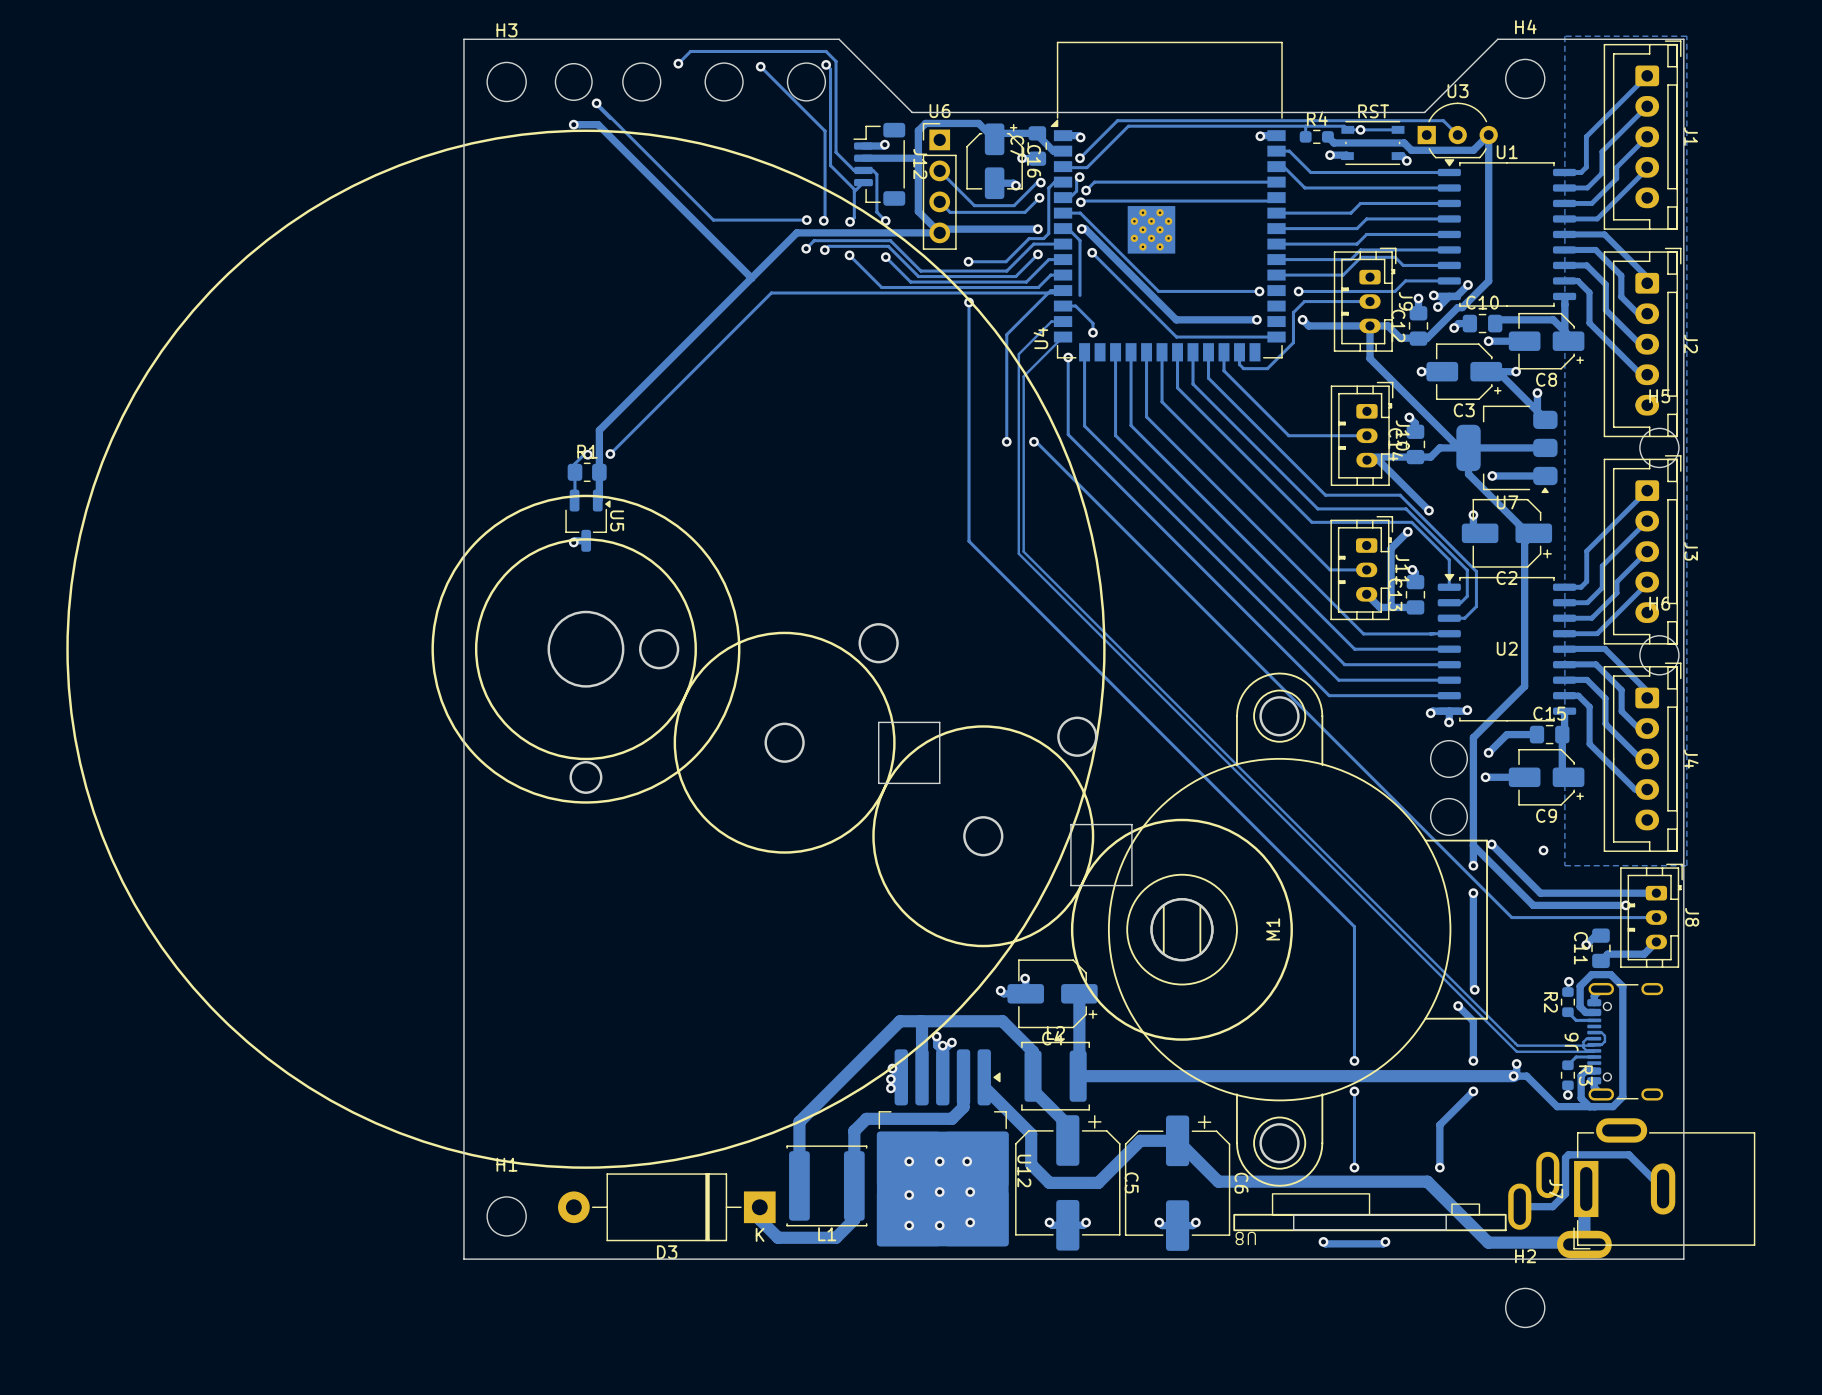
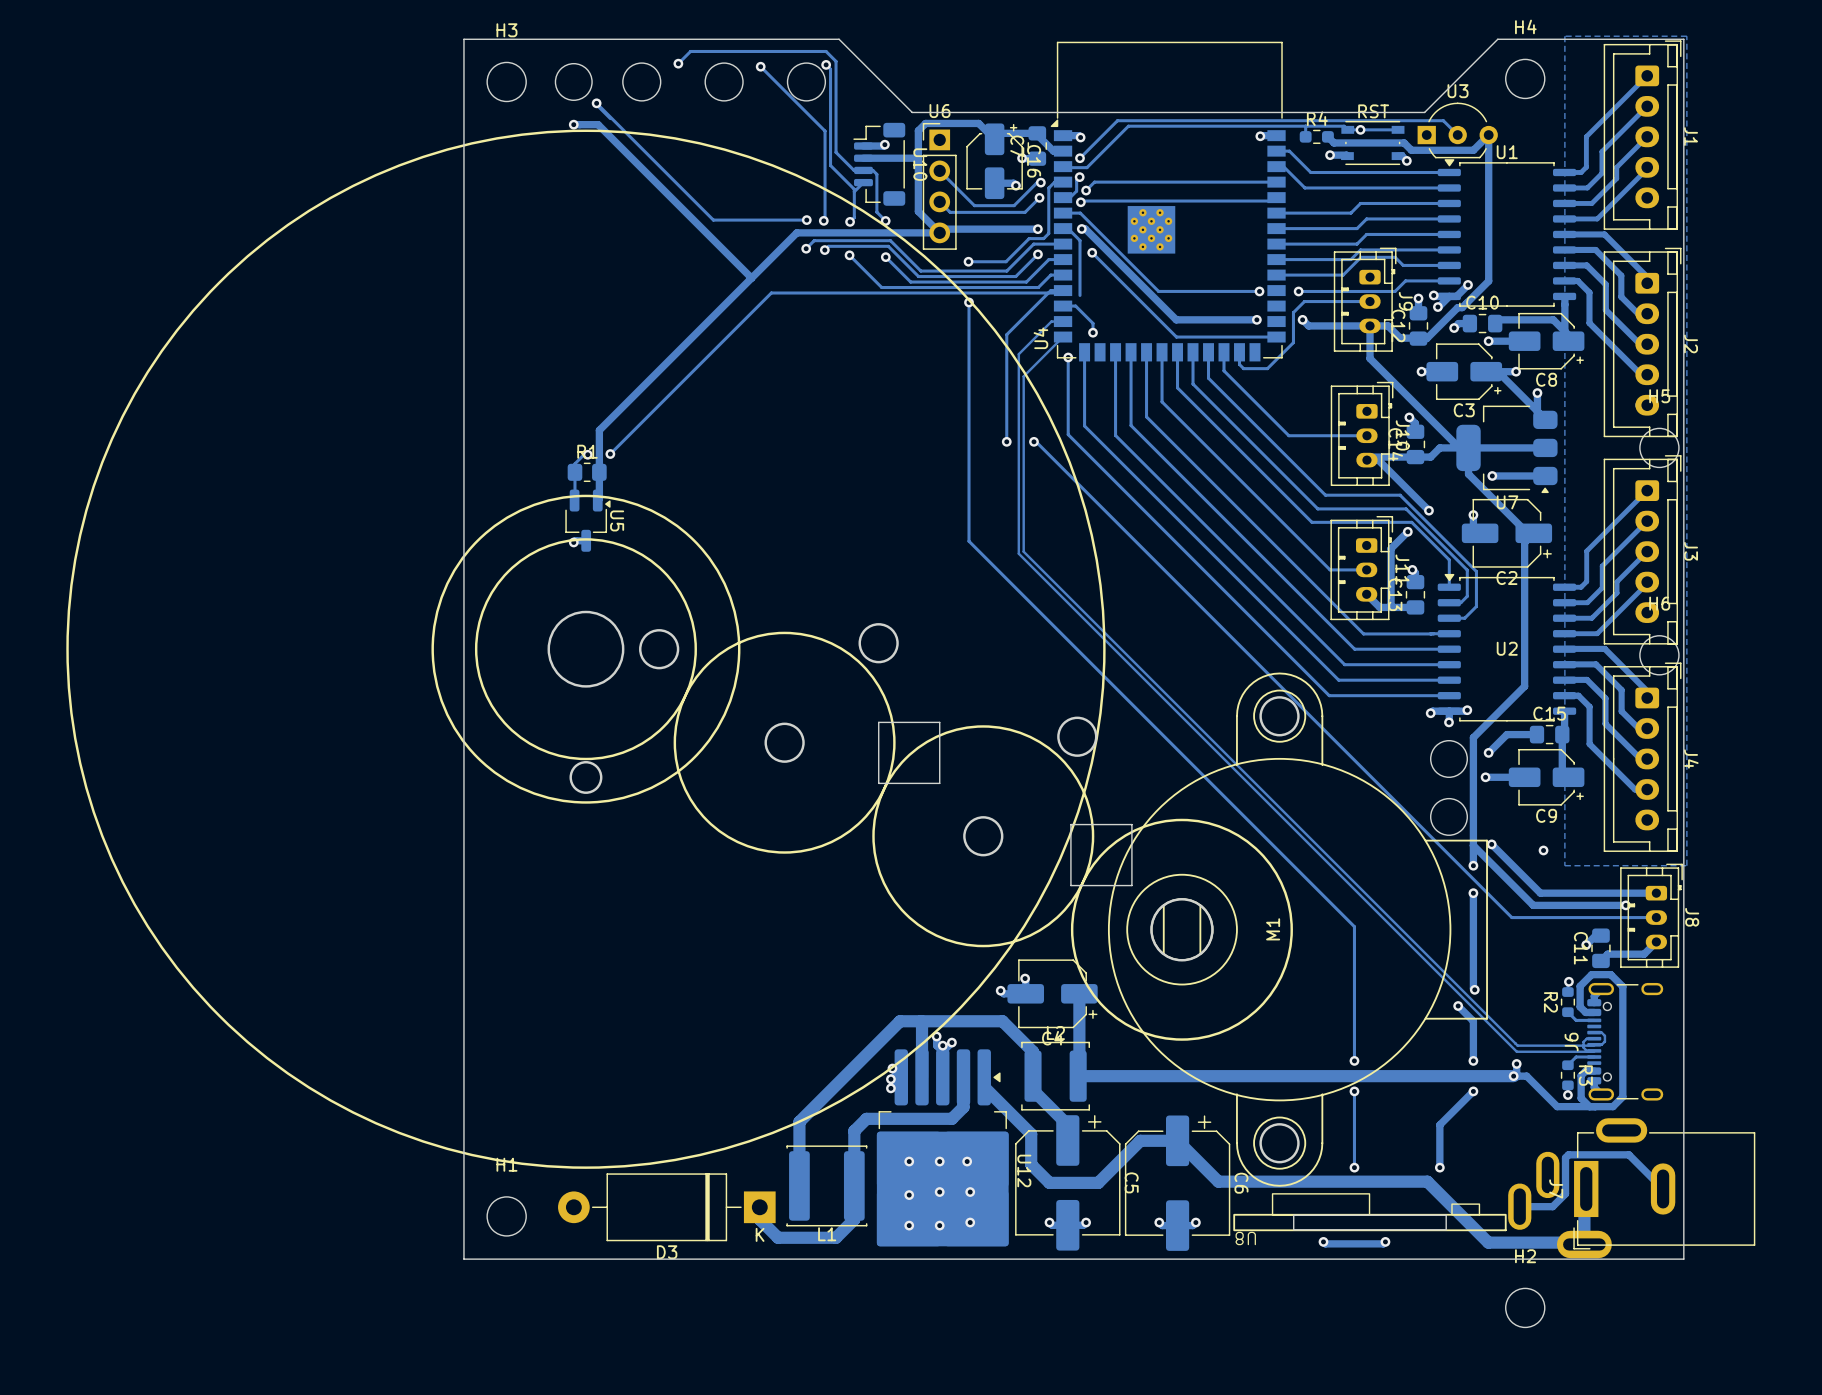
J12 name: J12 (920, 164) -> U10 (920, 164)

